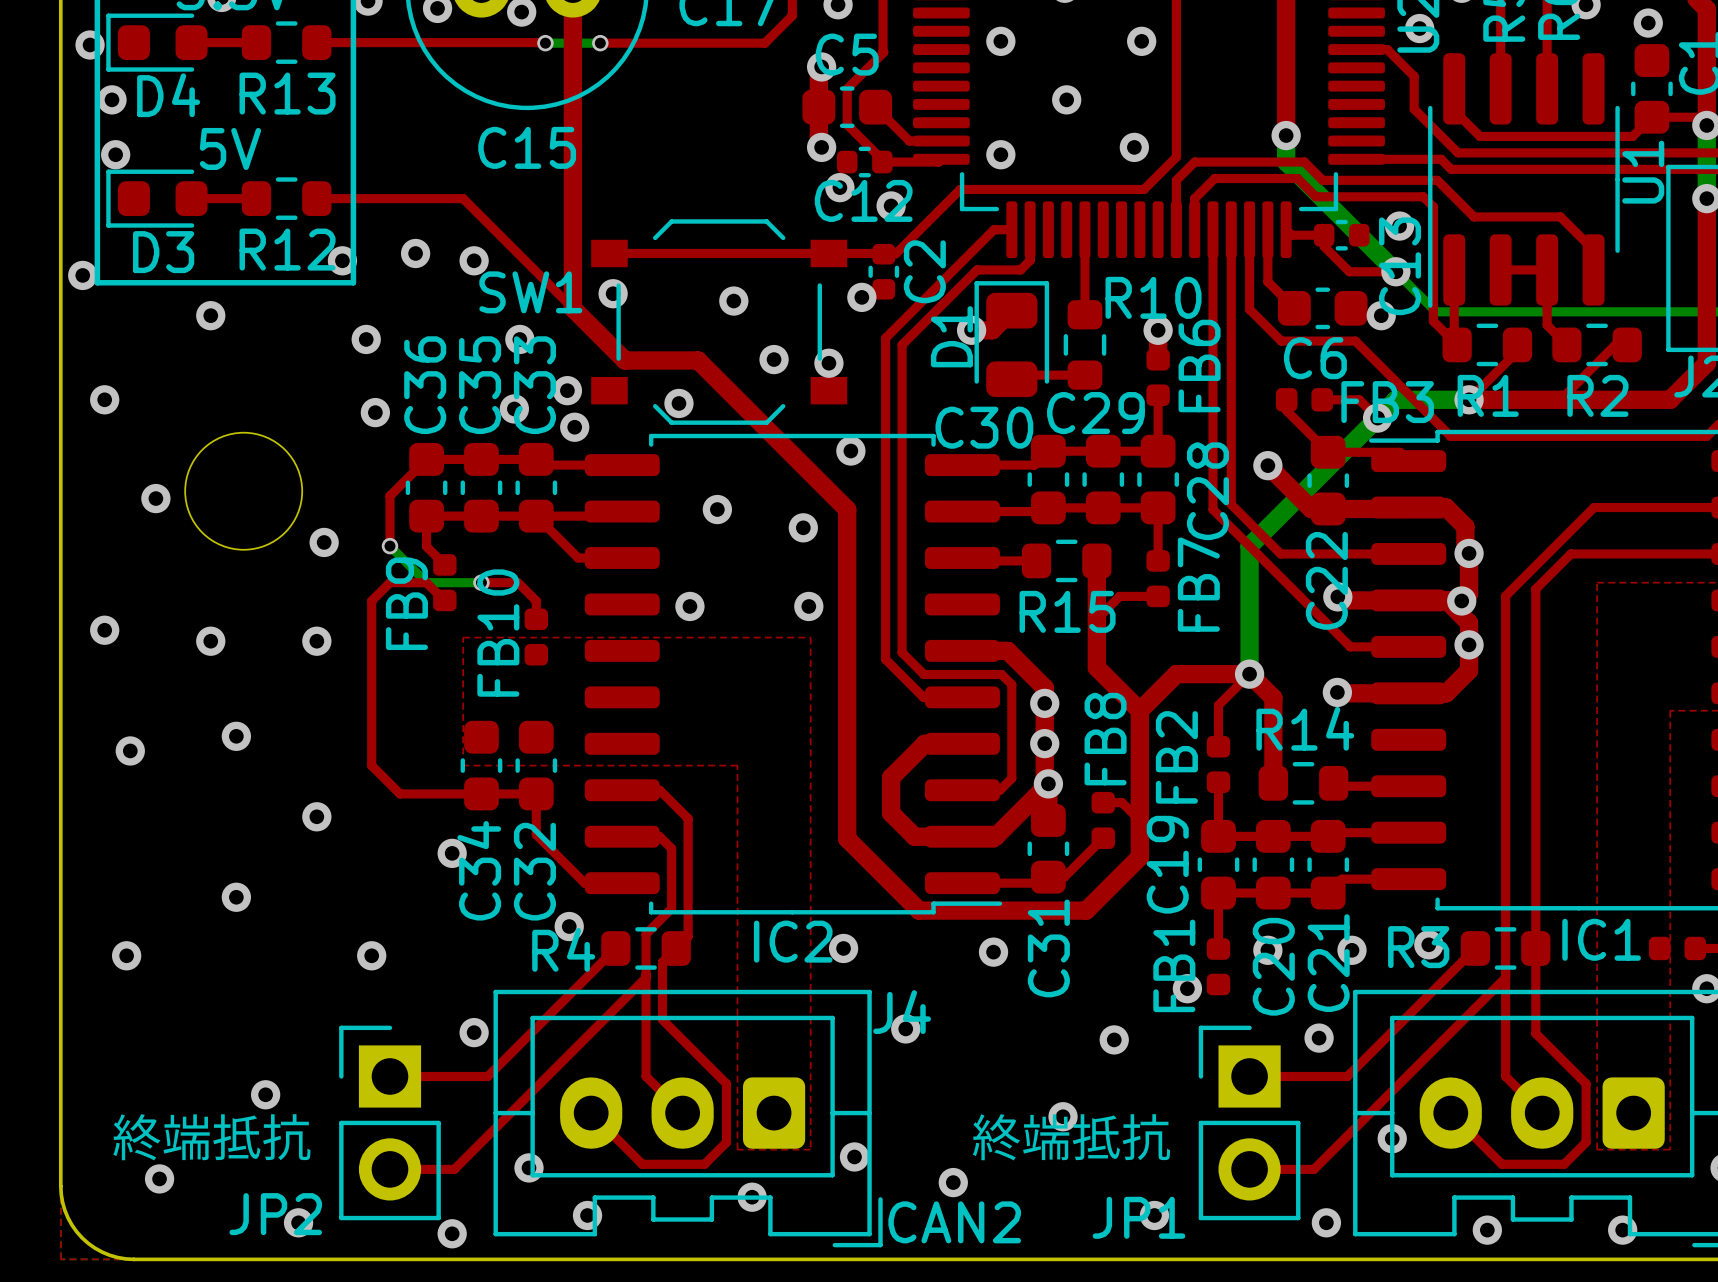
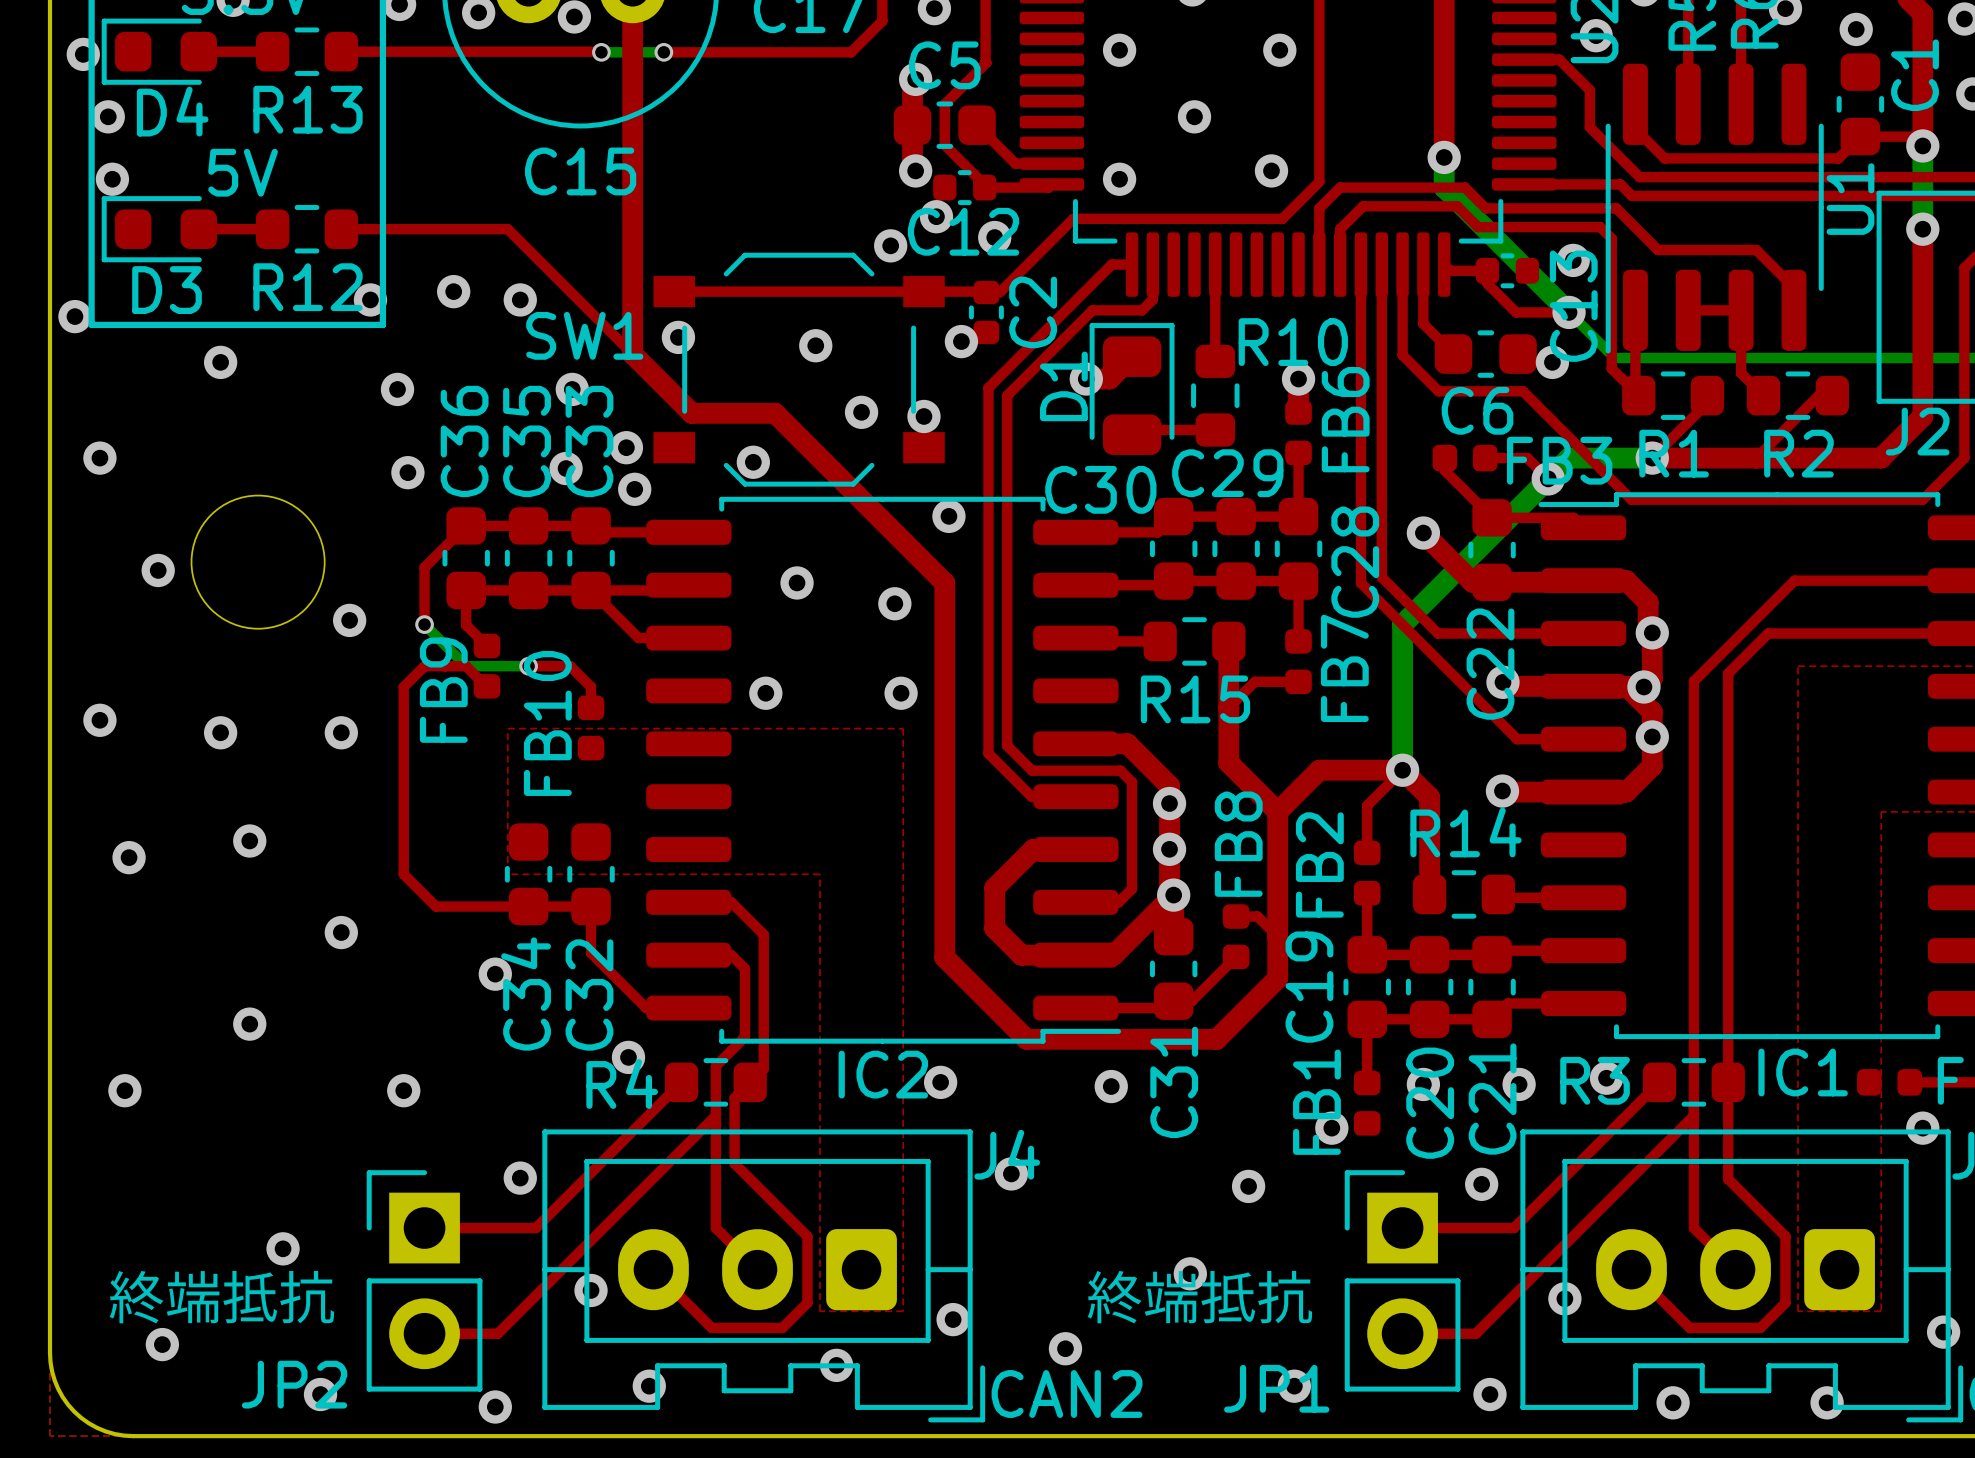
via: none -> (890, 245)
via position: (528, 1167) -> (591, 1290)

